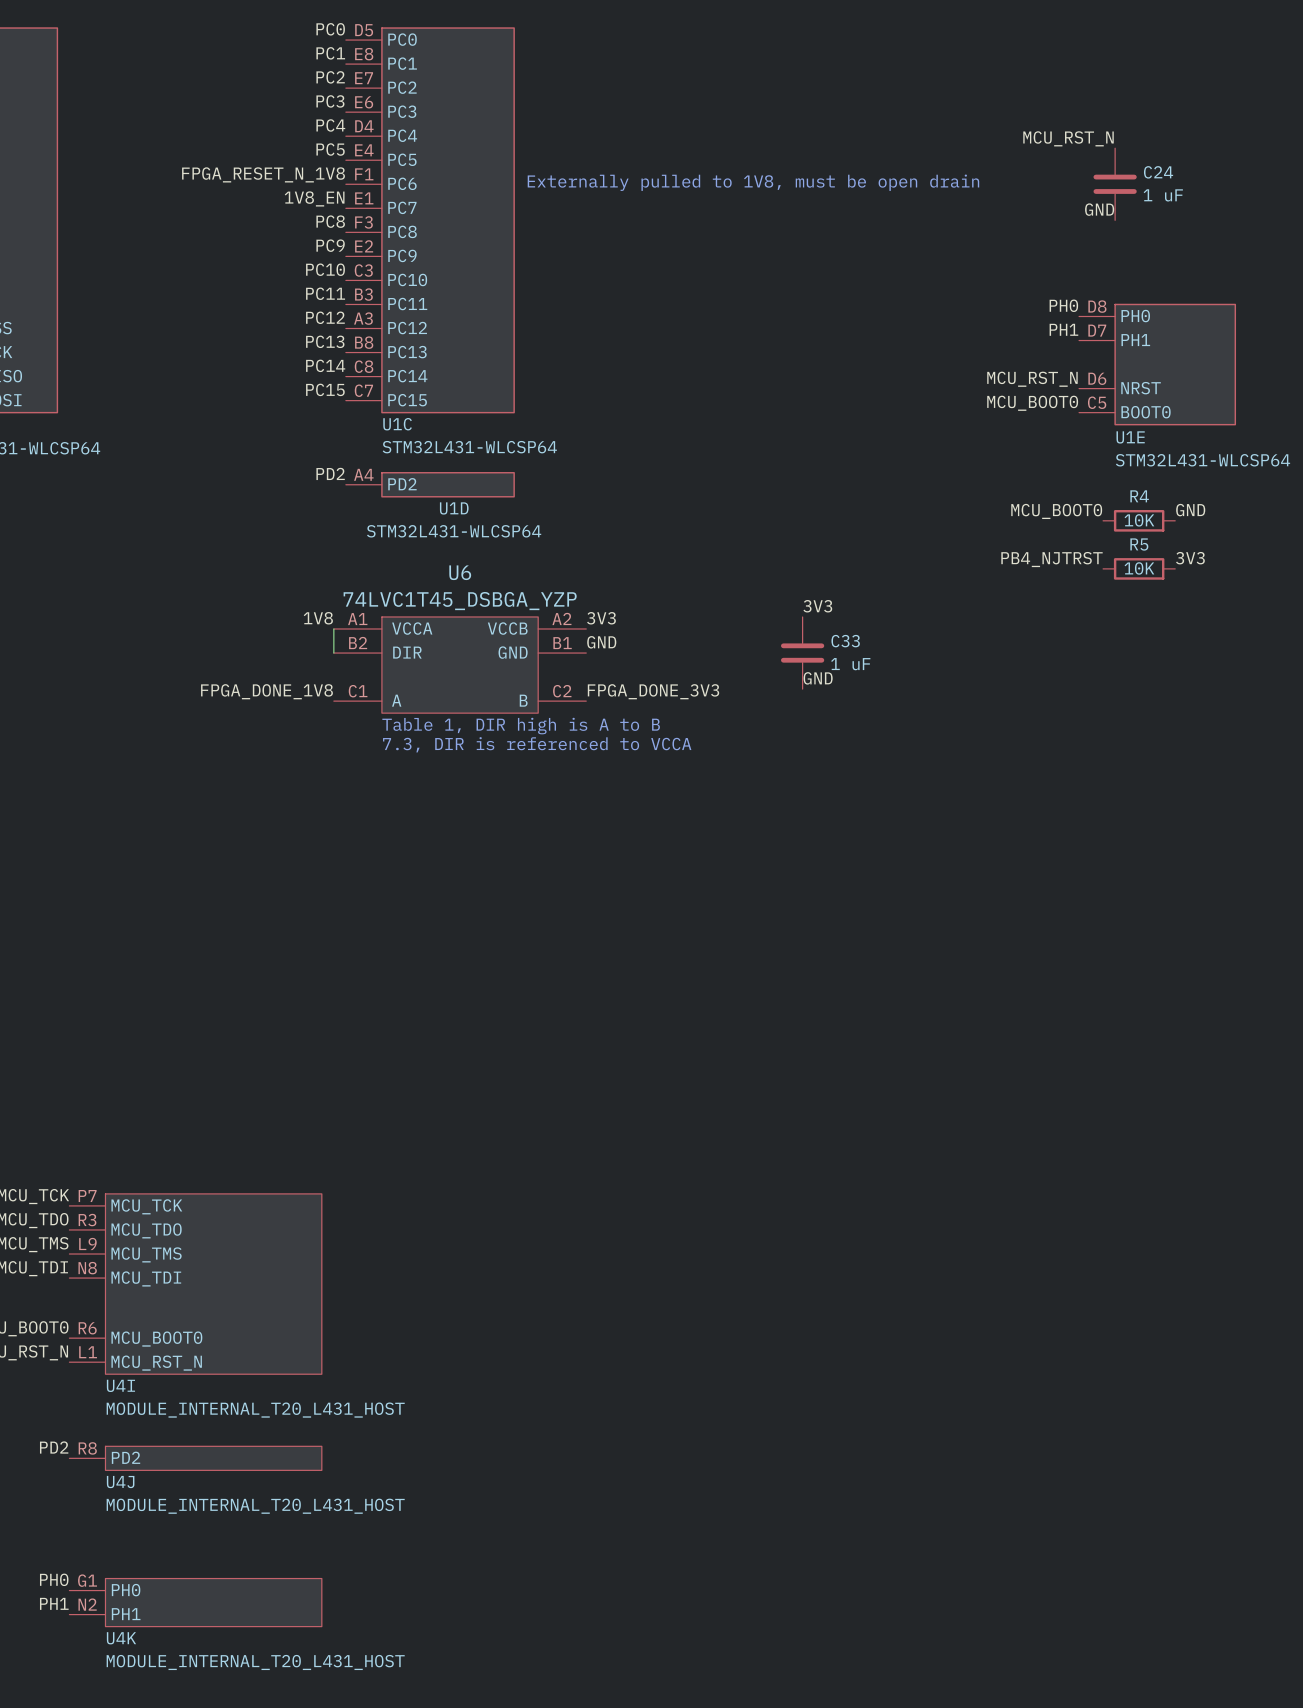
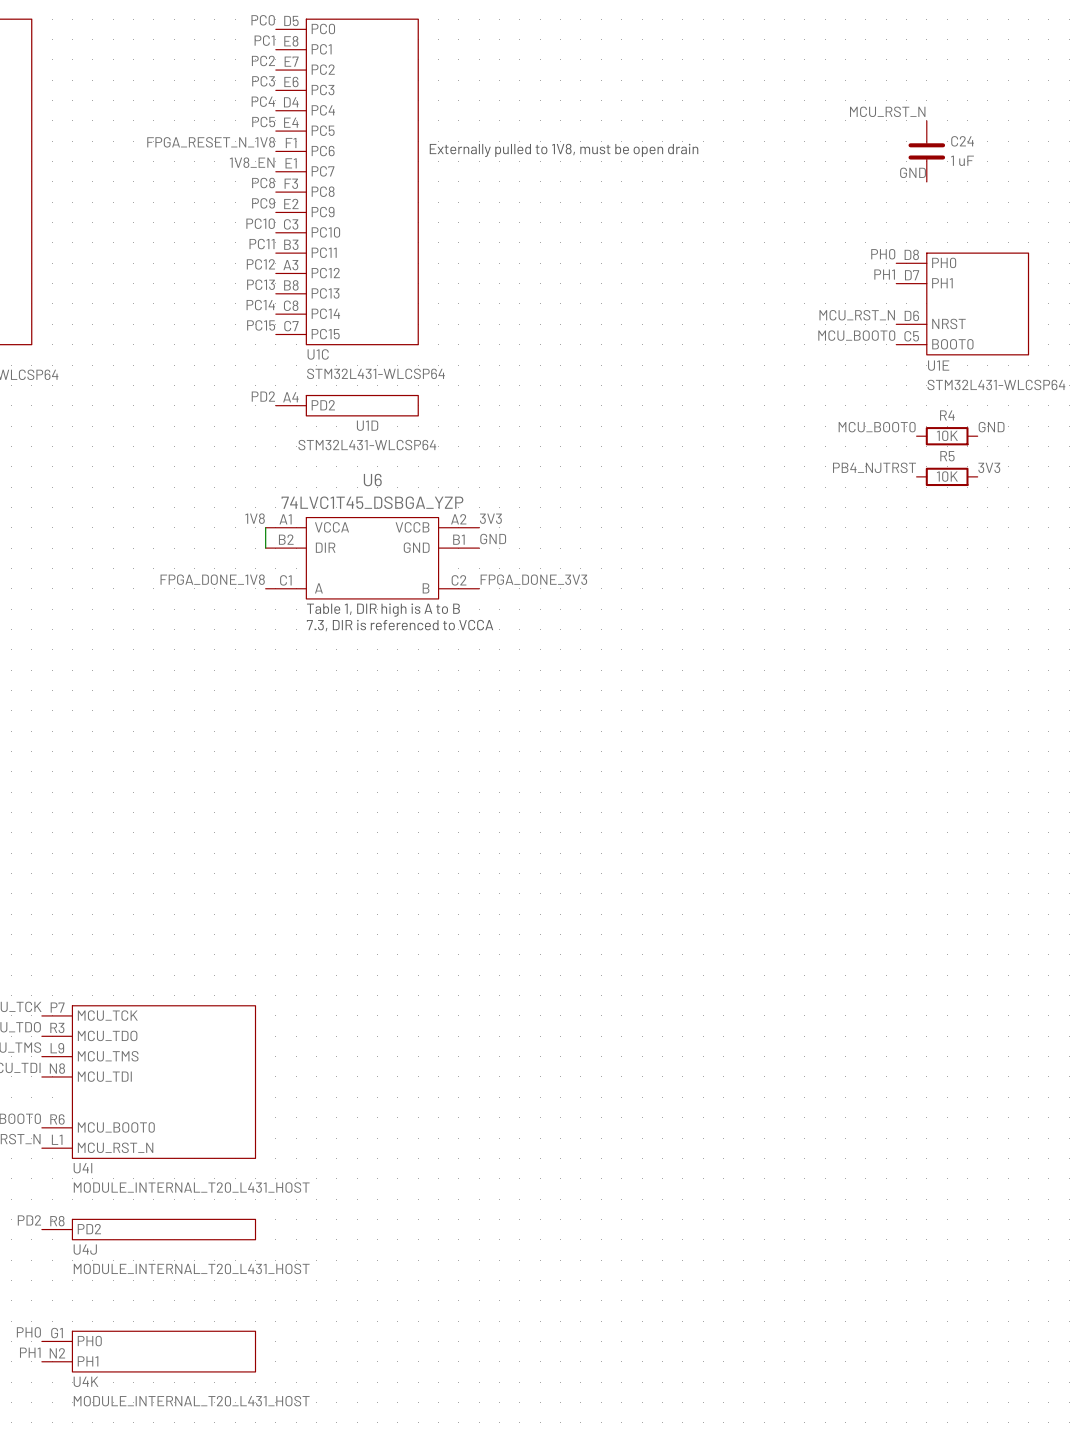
label: 3V3 (817, 606) -> none
C33: 1 uF (802, 653) -> none
label: GND (818, 678) -> none

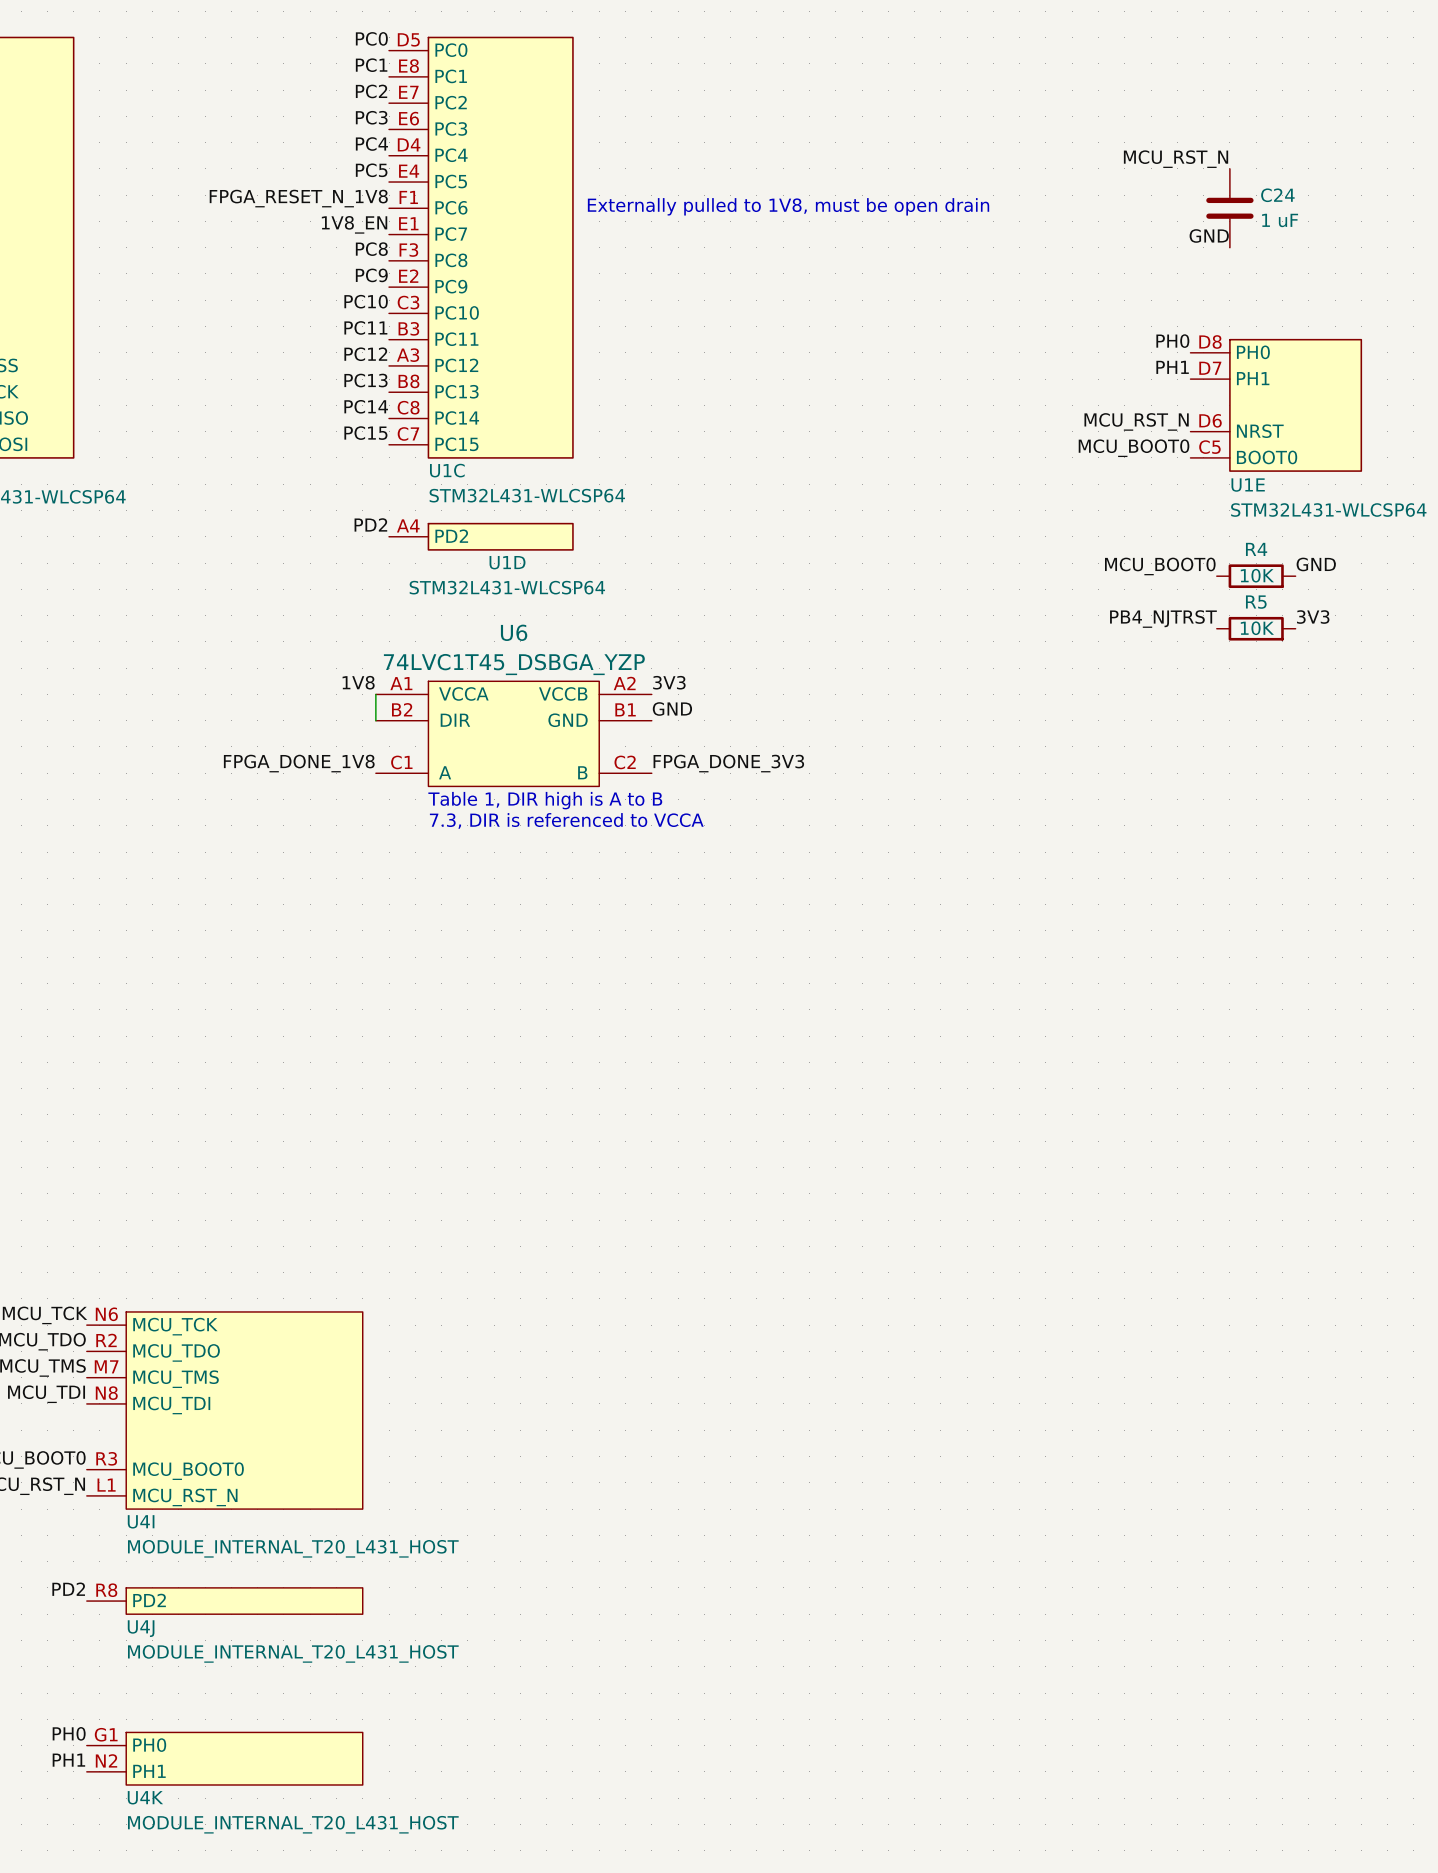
U4I pin number: P7 (57, 1007) -> N6 (106, 1314)
U4I pin number: R3 (57, 1027) -> R2 (106, 1340)
U4I pin number: L9 (57, 1048) -> M7 (106, 1366)
U4I pin number: R6 (57, 1119) -> R3 (106, 1458)

